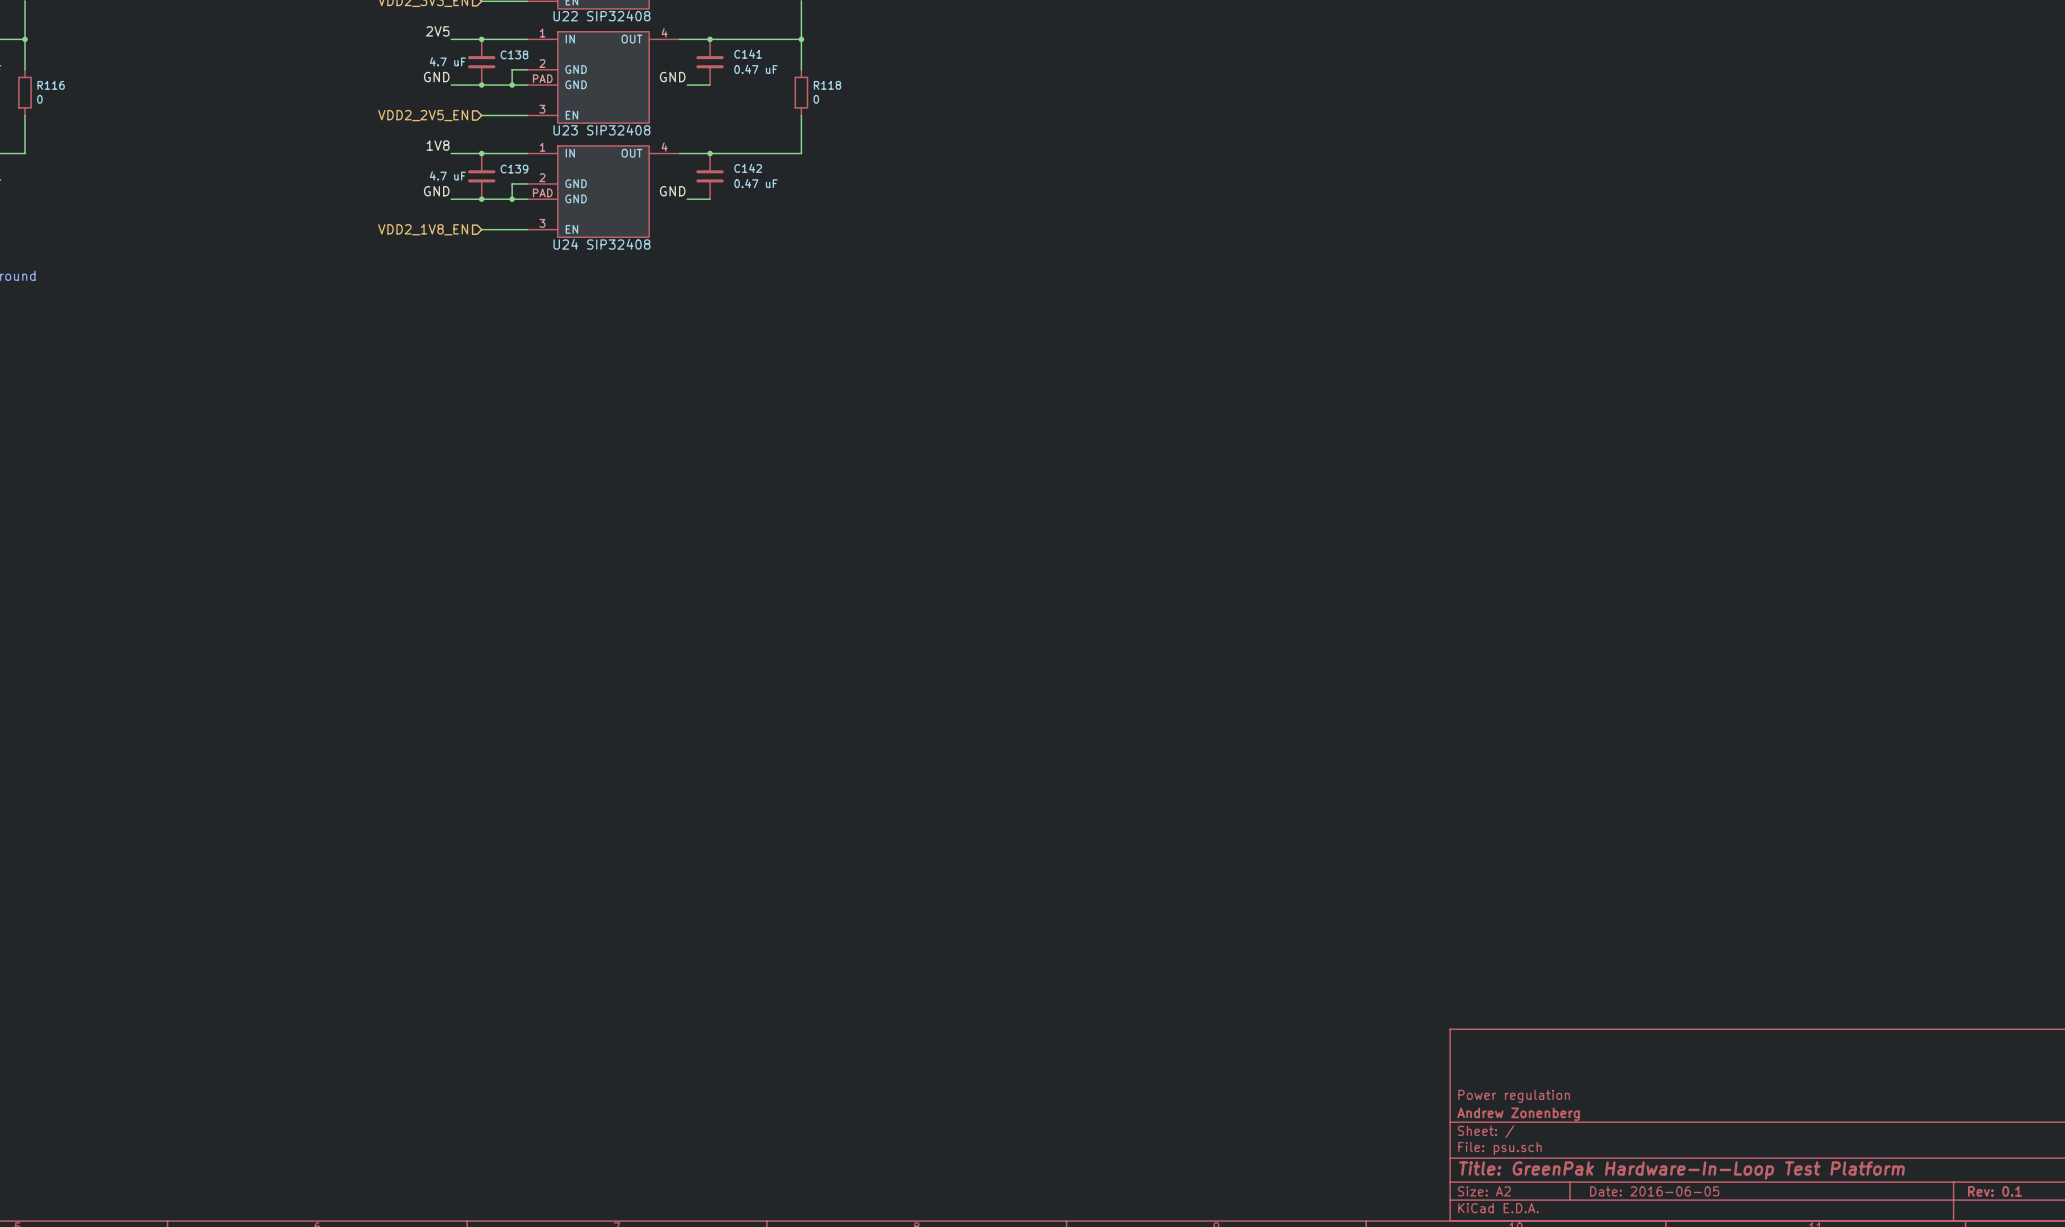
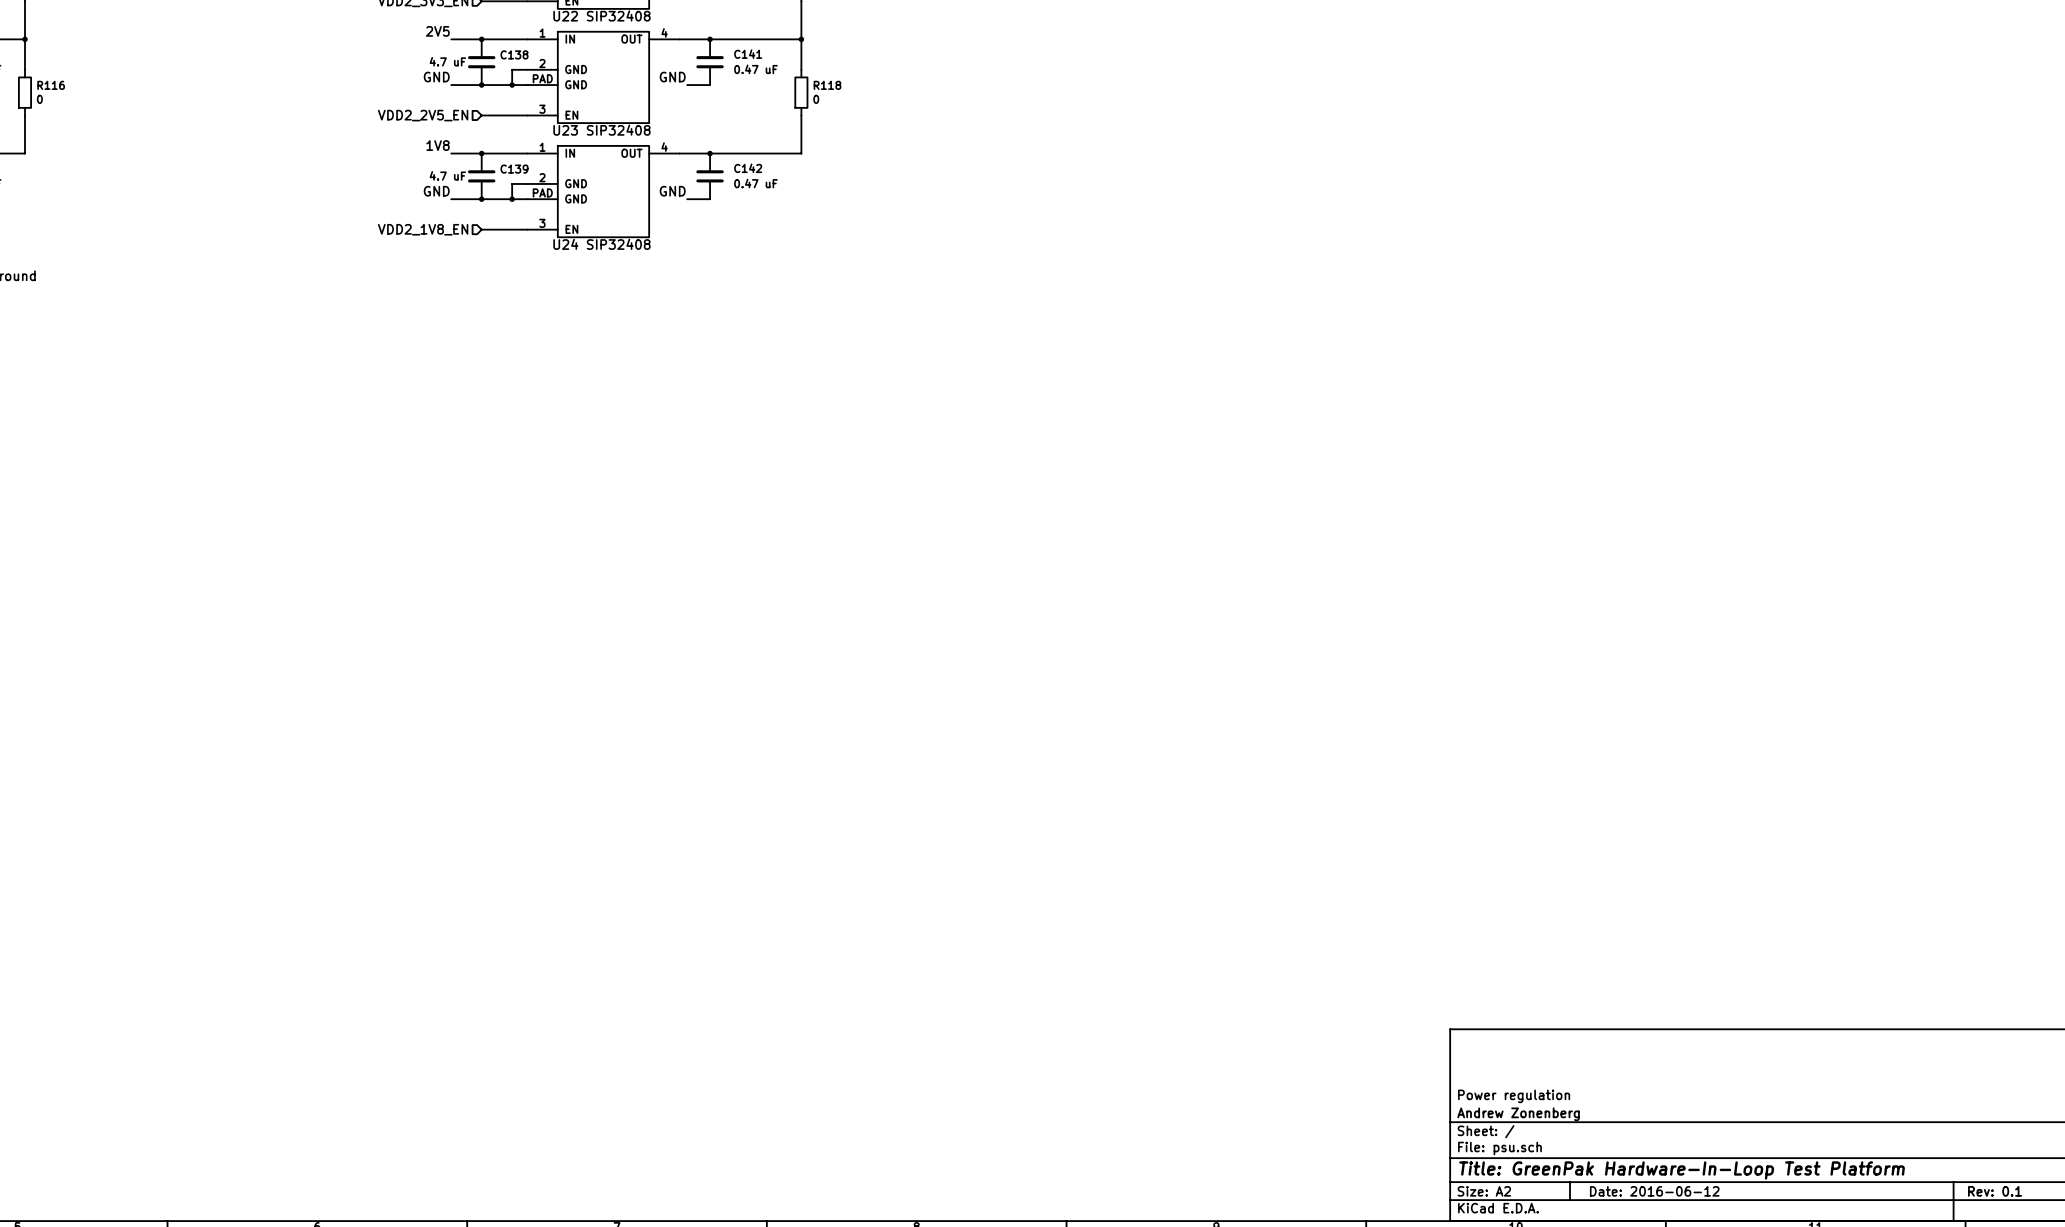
title block: Date: 2016-06-05 (1654, 1191) -> Date: 2016-06-12 (1654, 1191)

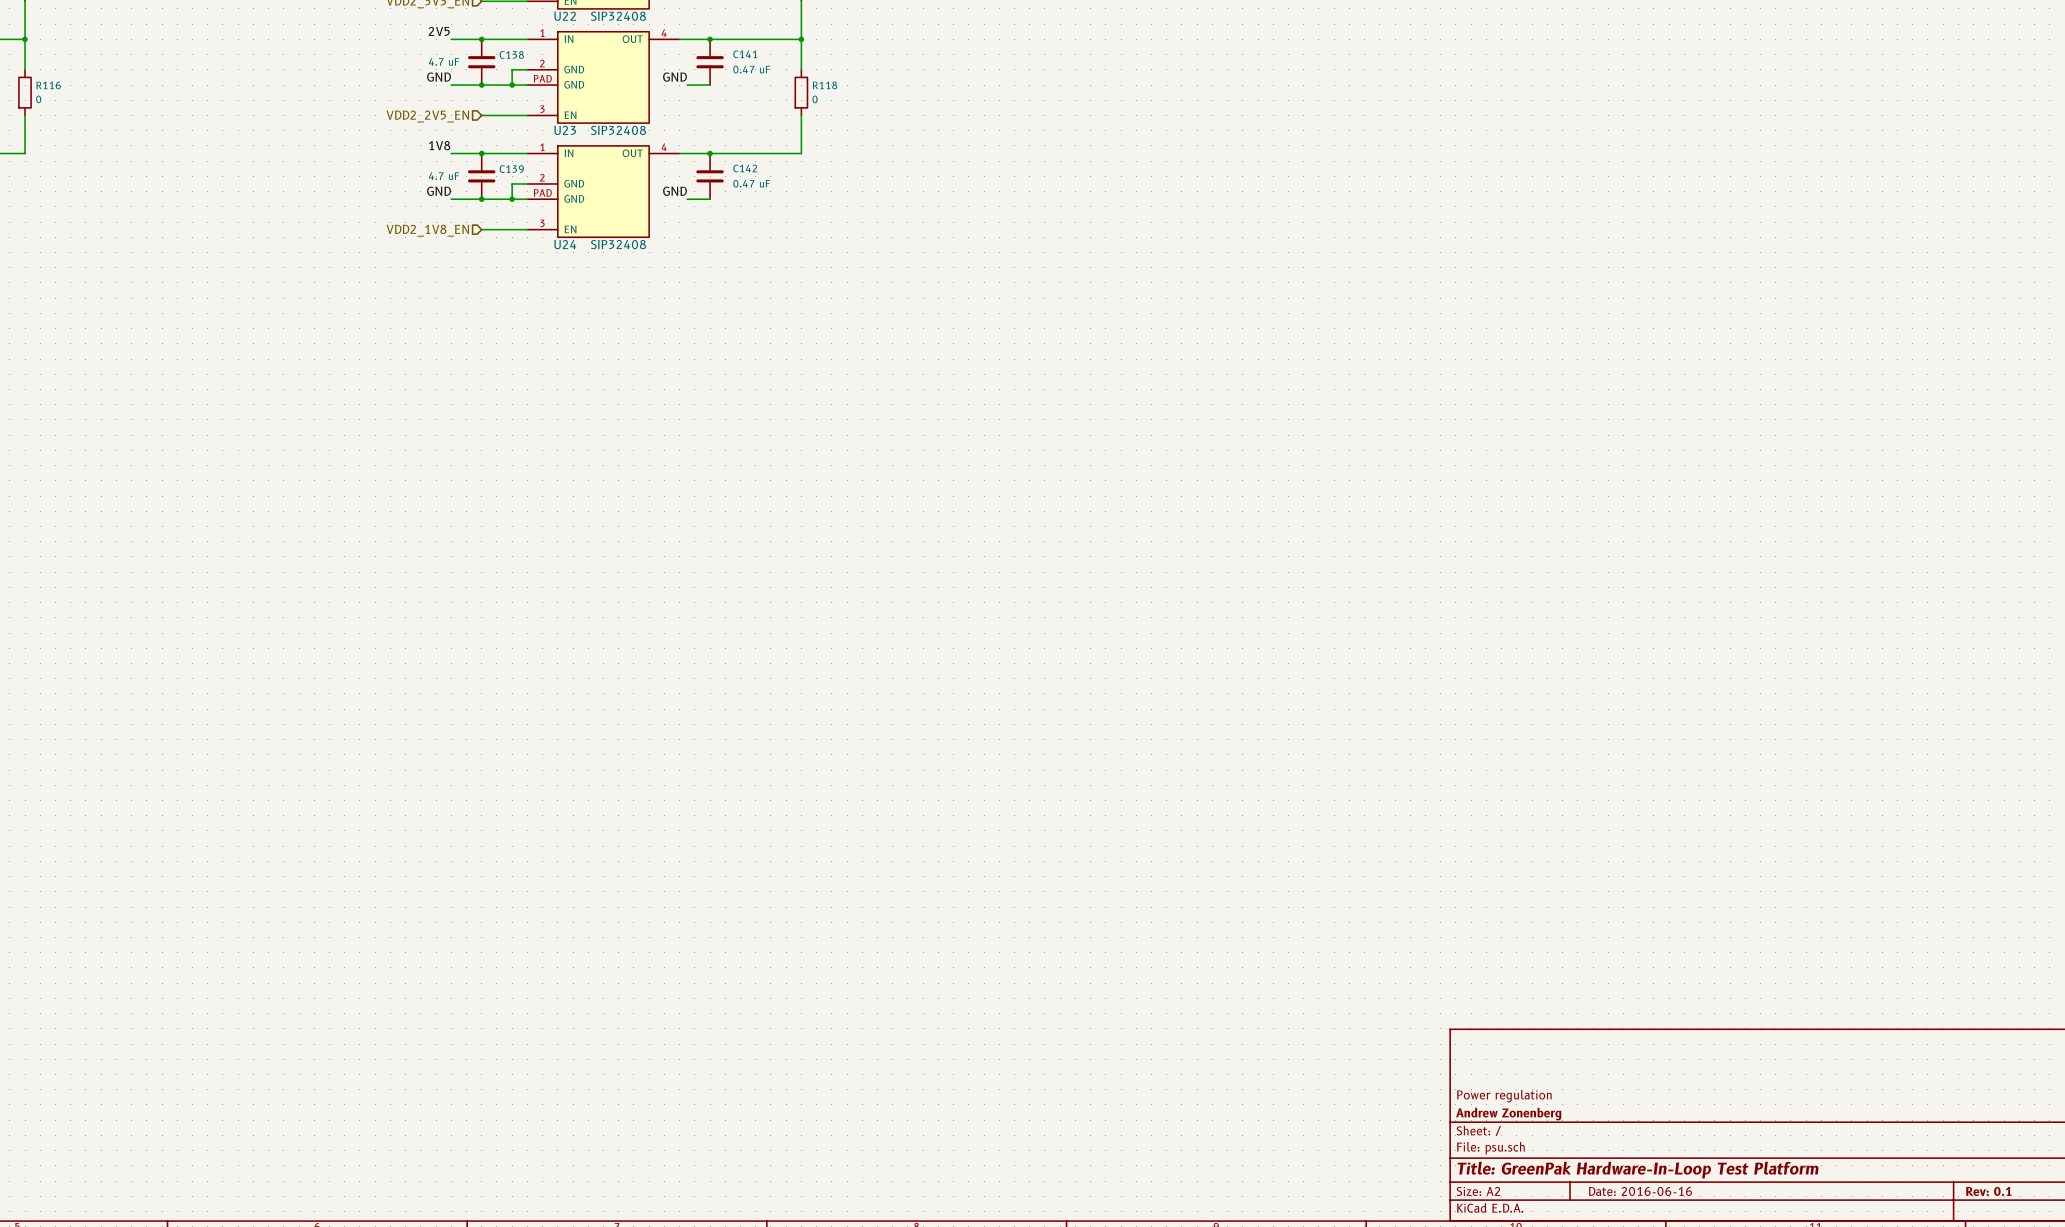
title block: Date: 2016-06-12 (1654, 1191) -> Date: 2016-06-16 (1640, 1191)

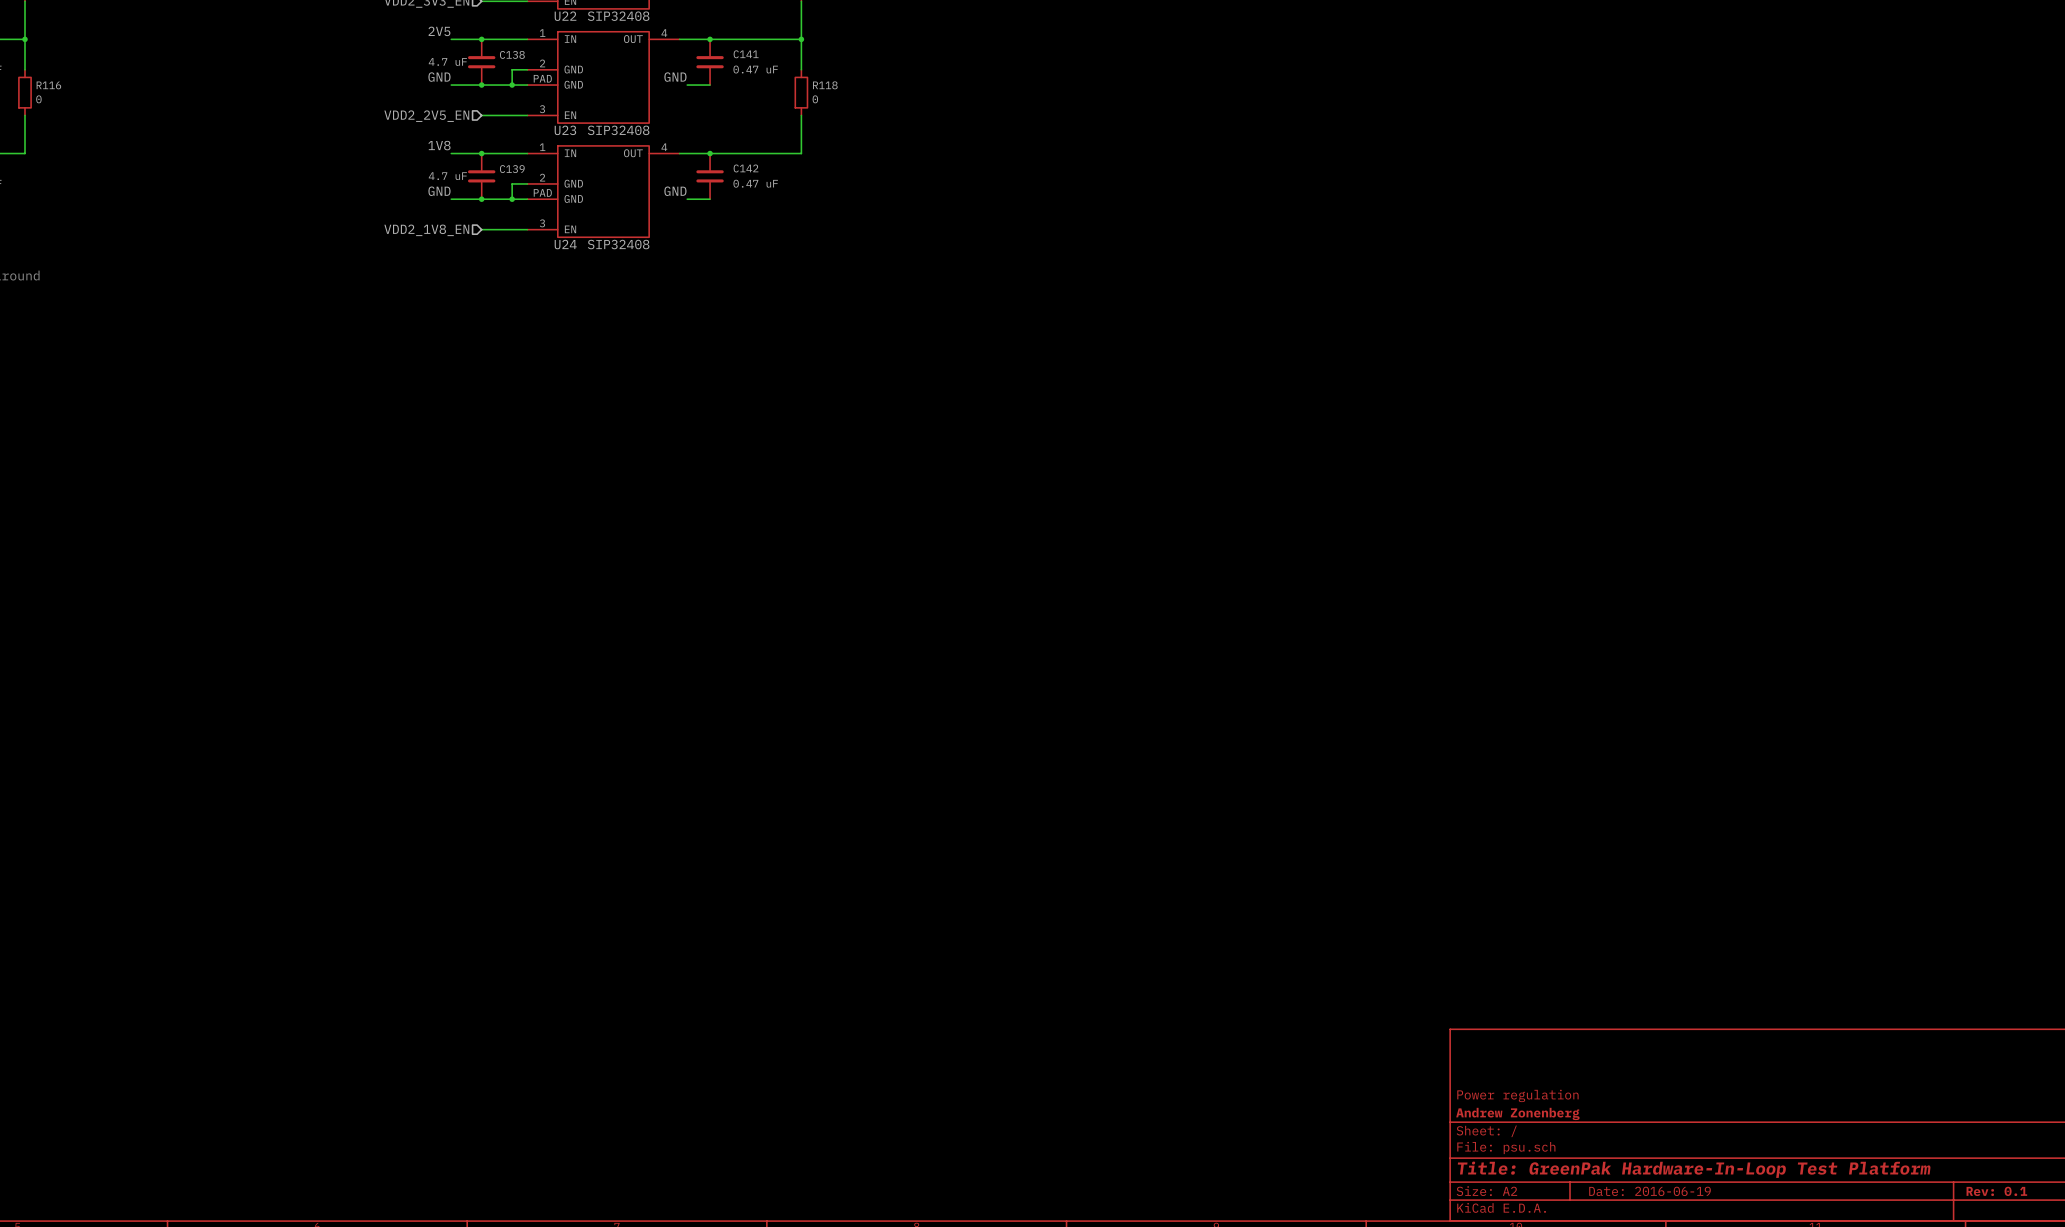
title block: Date: 2016-06-16 (1640, 1191) -> Date: 2016-06-19 (1650, 1191)

